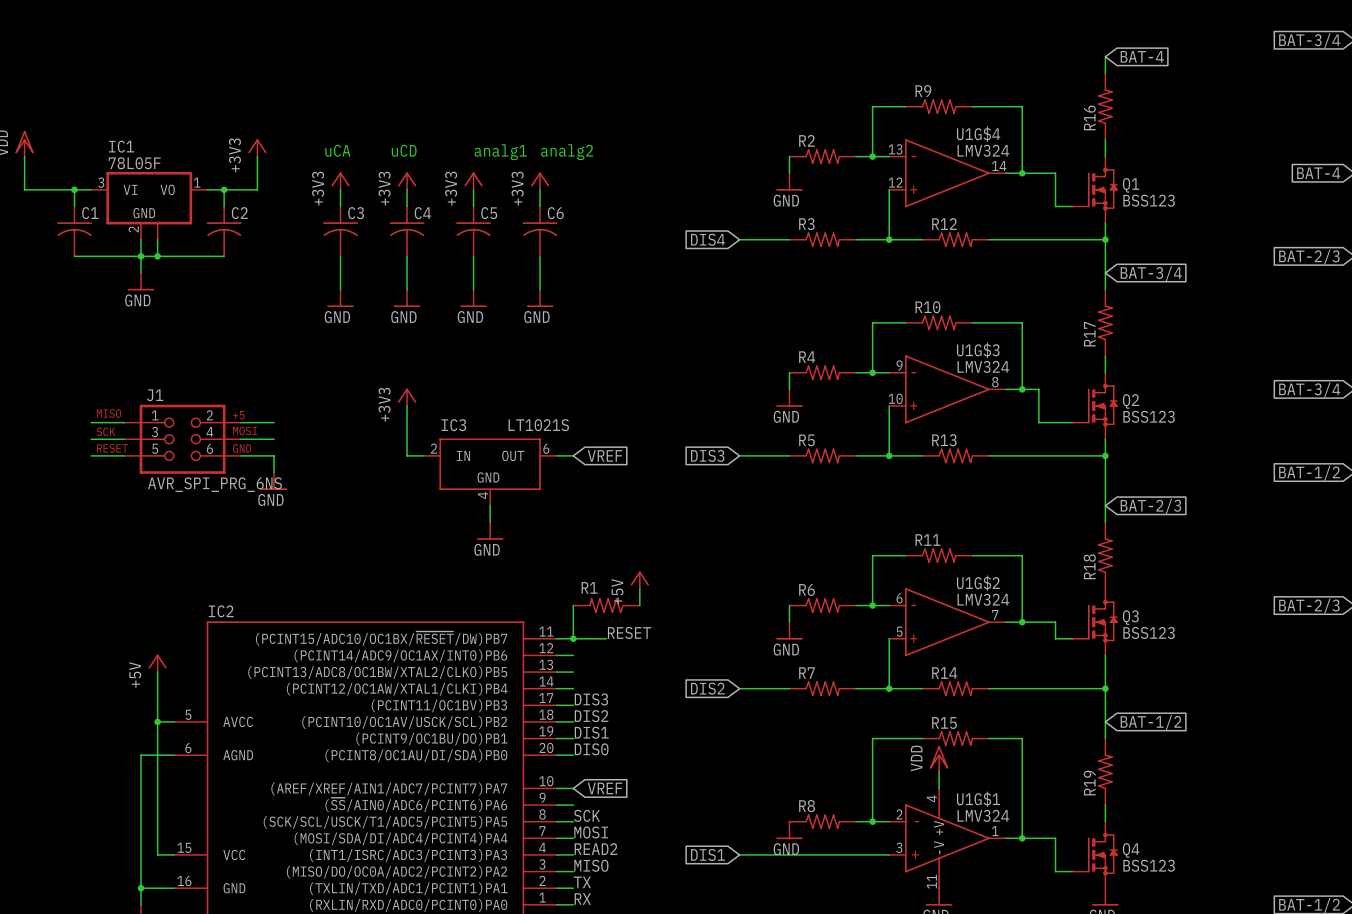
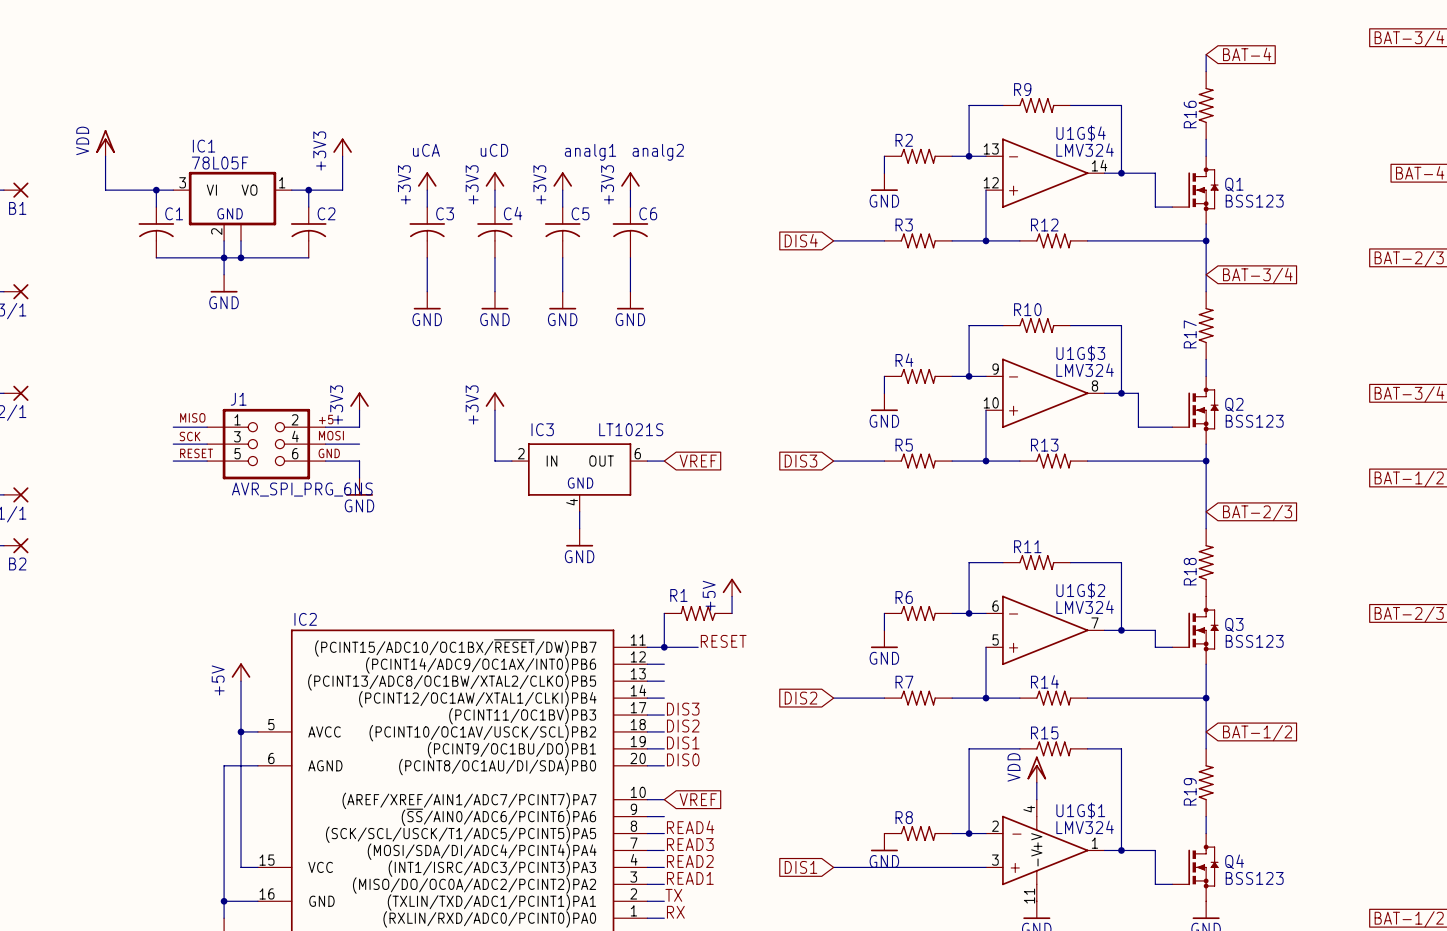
power symbol: none -> +3V3 (359, 401)
wire: none -> (359, 410) (359, 427)
label: SCK (586, 815) -> READ4 (690, 827)
label: MOSI (591, 832) -> READ3 (690, 844)
label: MISO (591, 865) -> READ1 (690, 878)

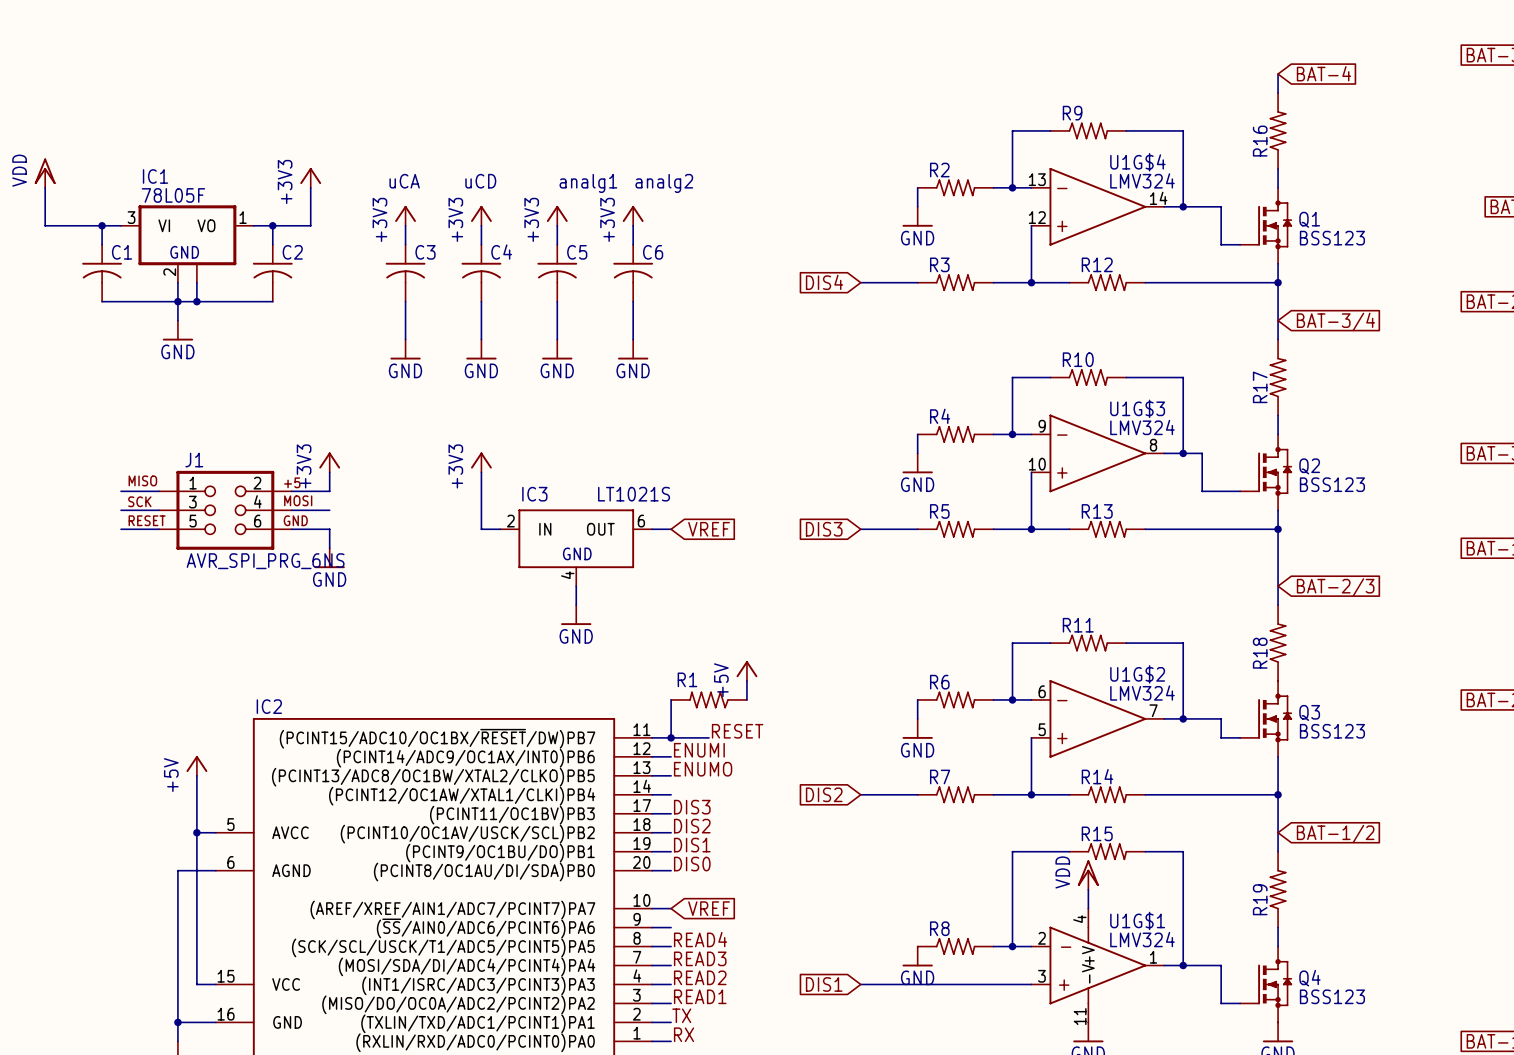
label: none -> ENUMI (699, 750)
label: none -> ENUMO (703, 769)

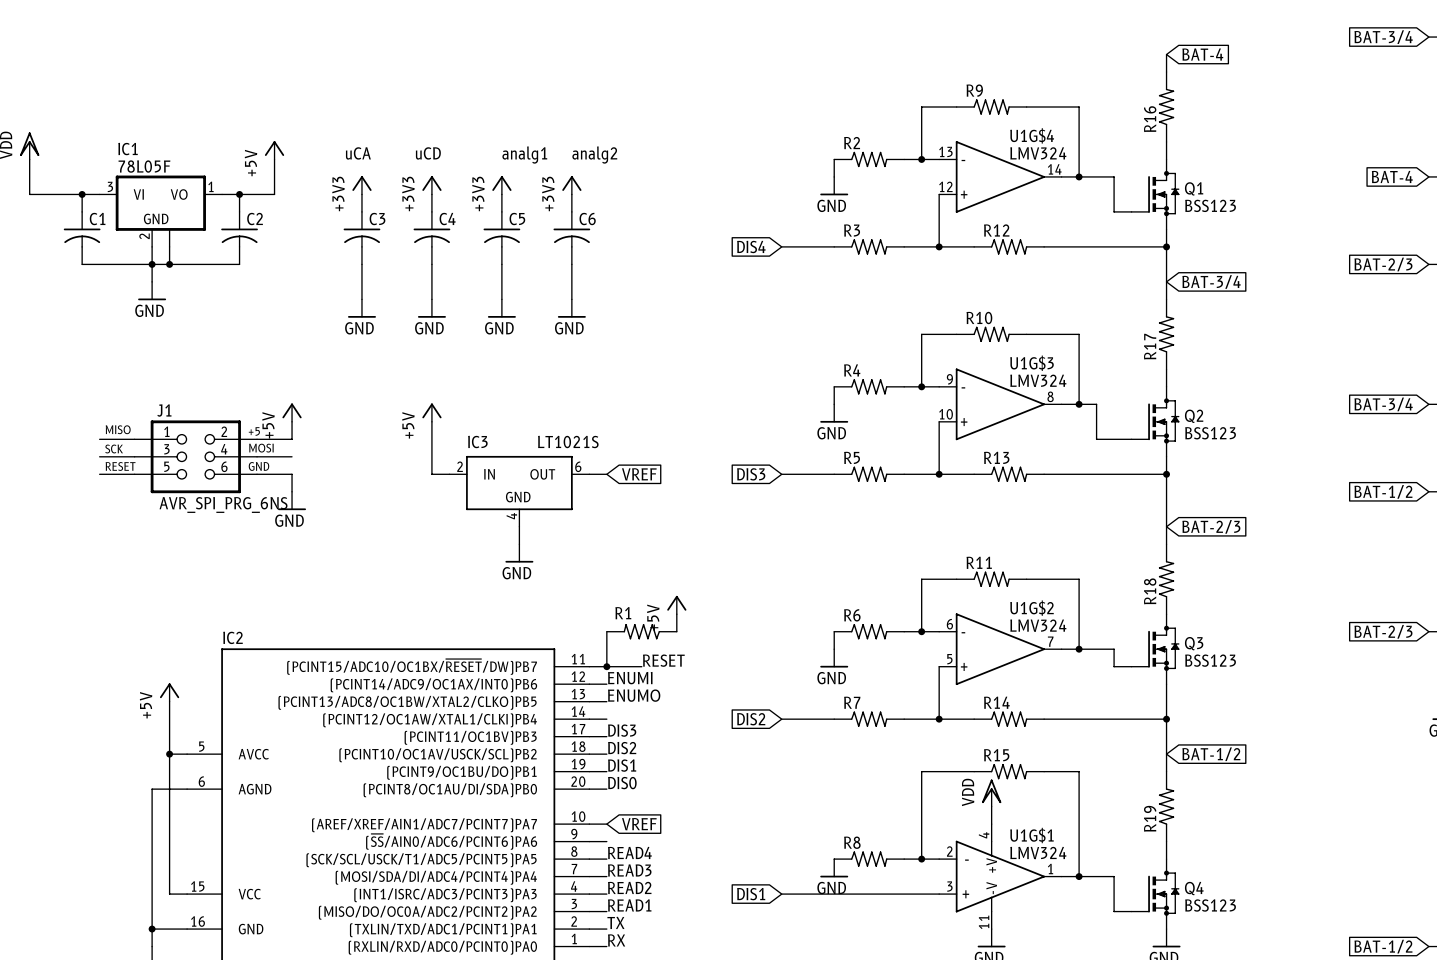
power symbol: +3V3 (310, 177) -> +5V (274, 150)
power symbol: +3V3 (329, 462) -> +5V (292, 412)
power symbol: +3V3 (481, 462) -> +5V (431, 412)

